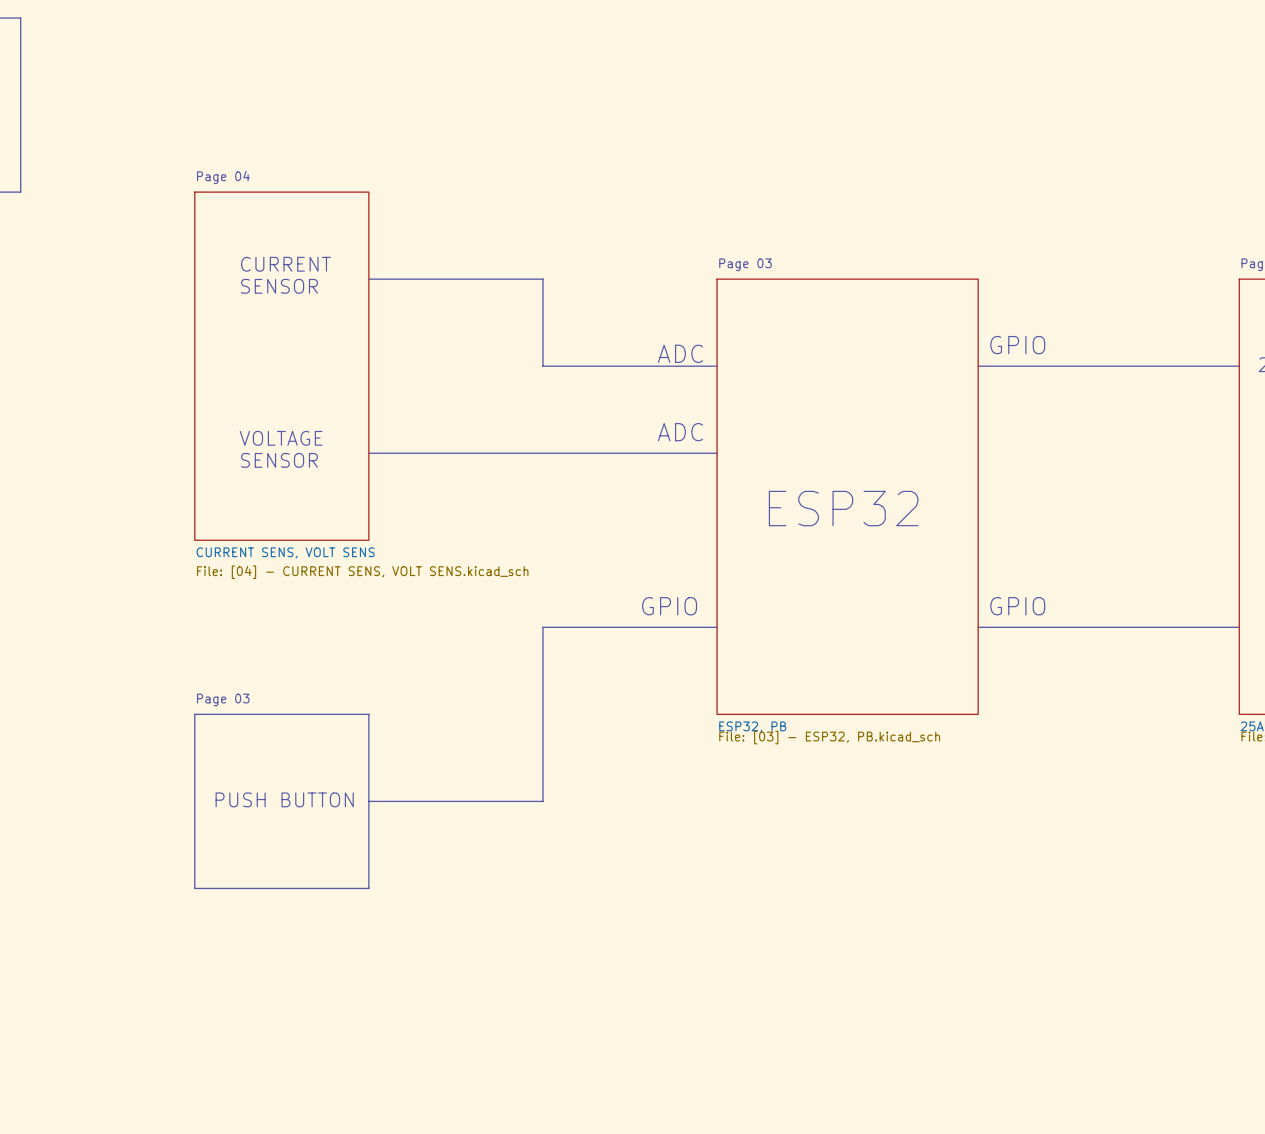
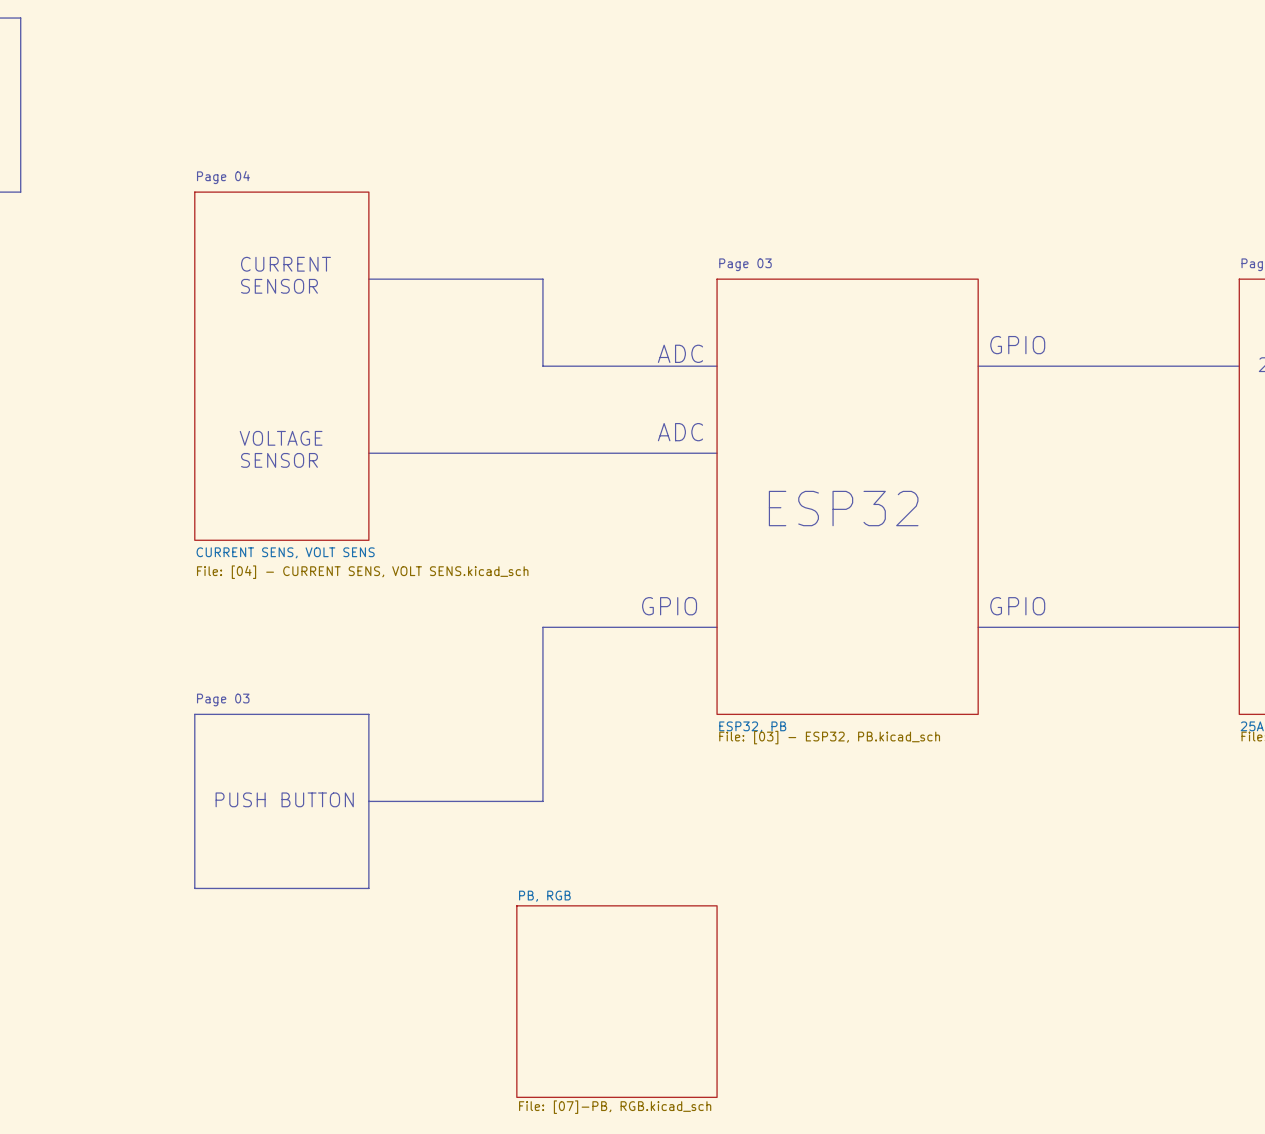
sheet PB, RGB: none -> File: [07]-PB, RGB.kicad_sch (616, 1001)

